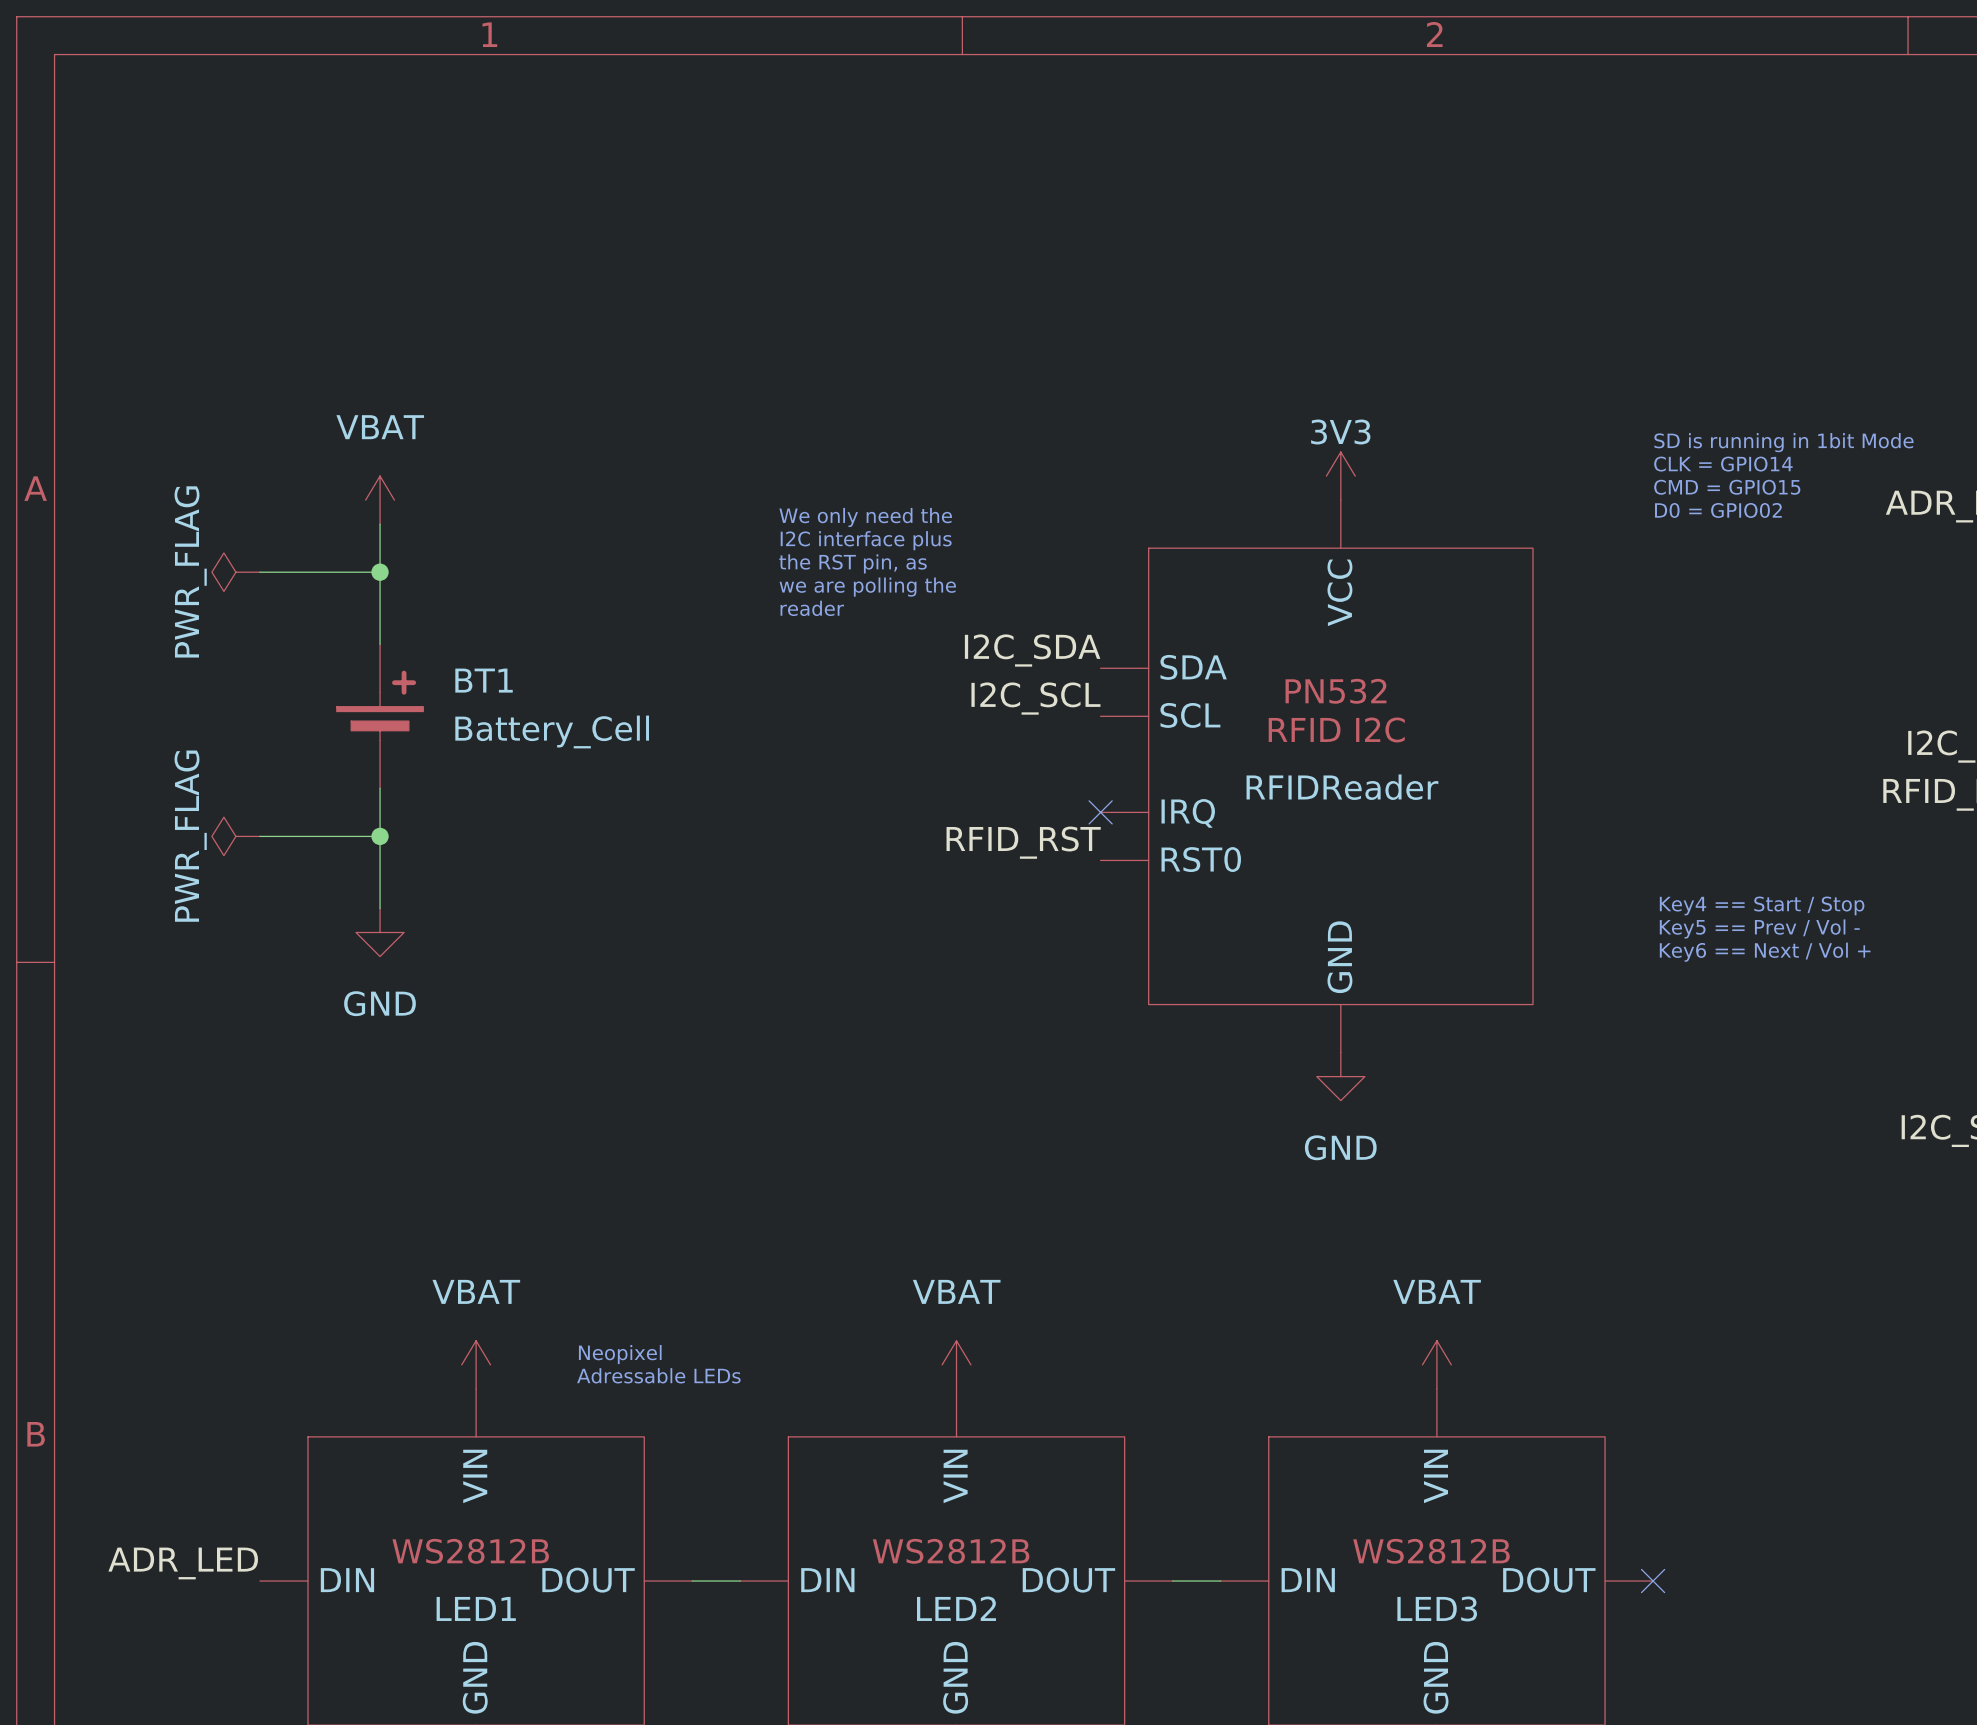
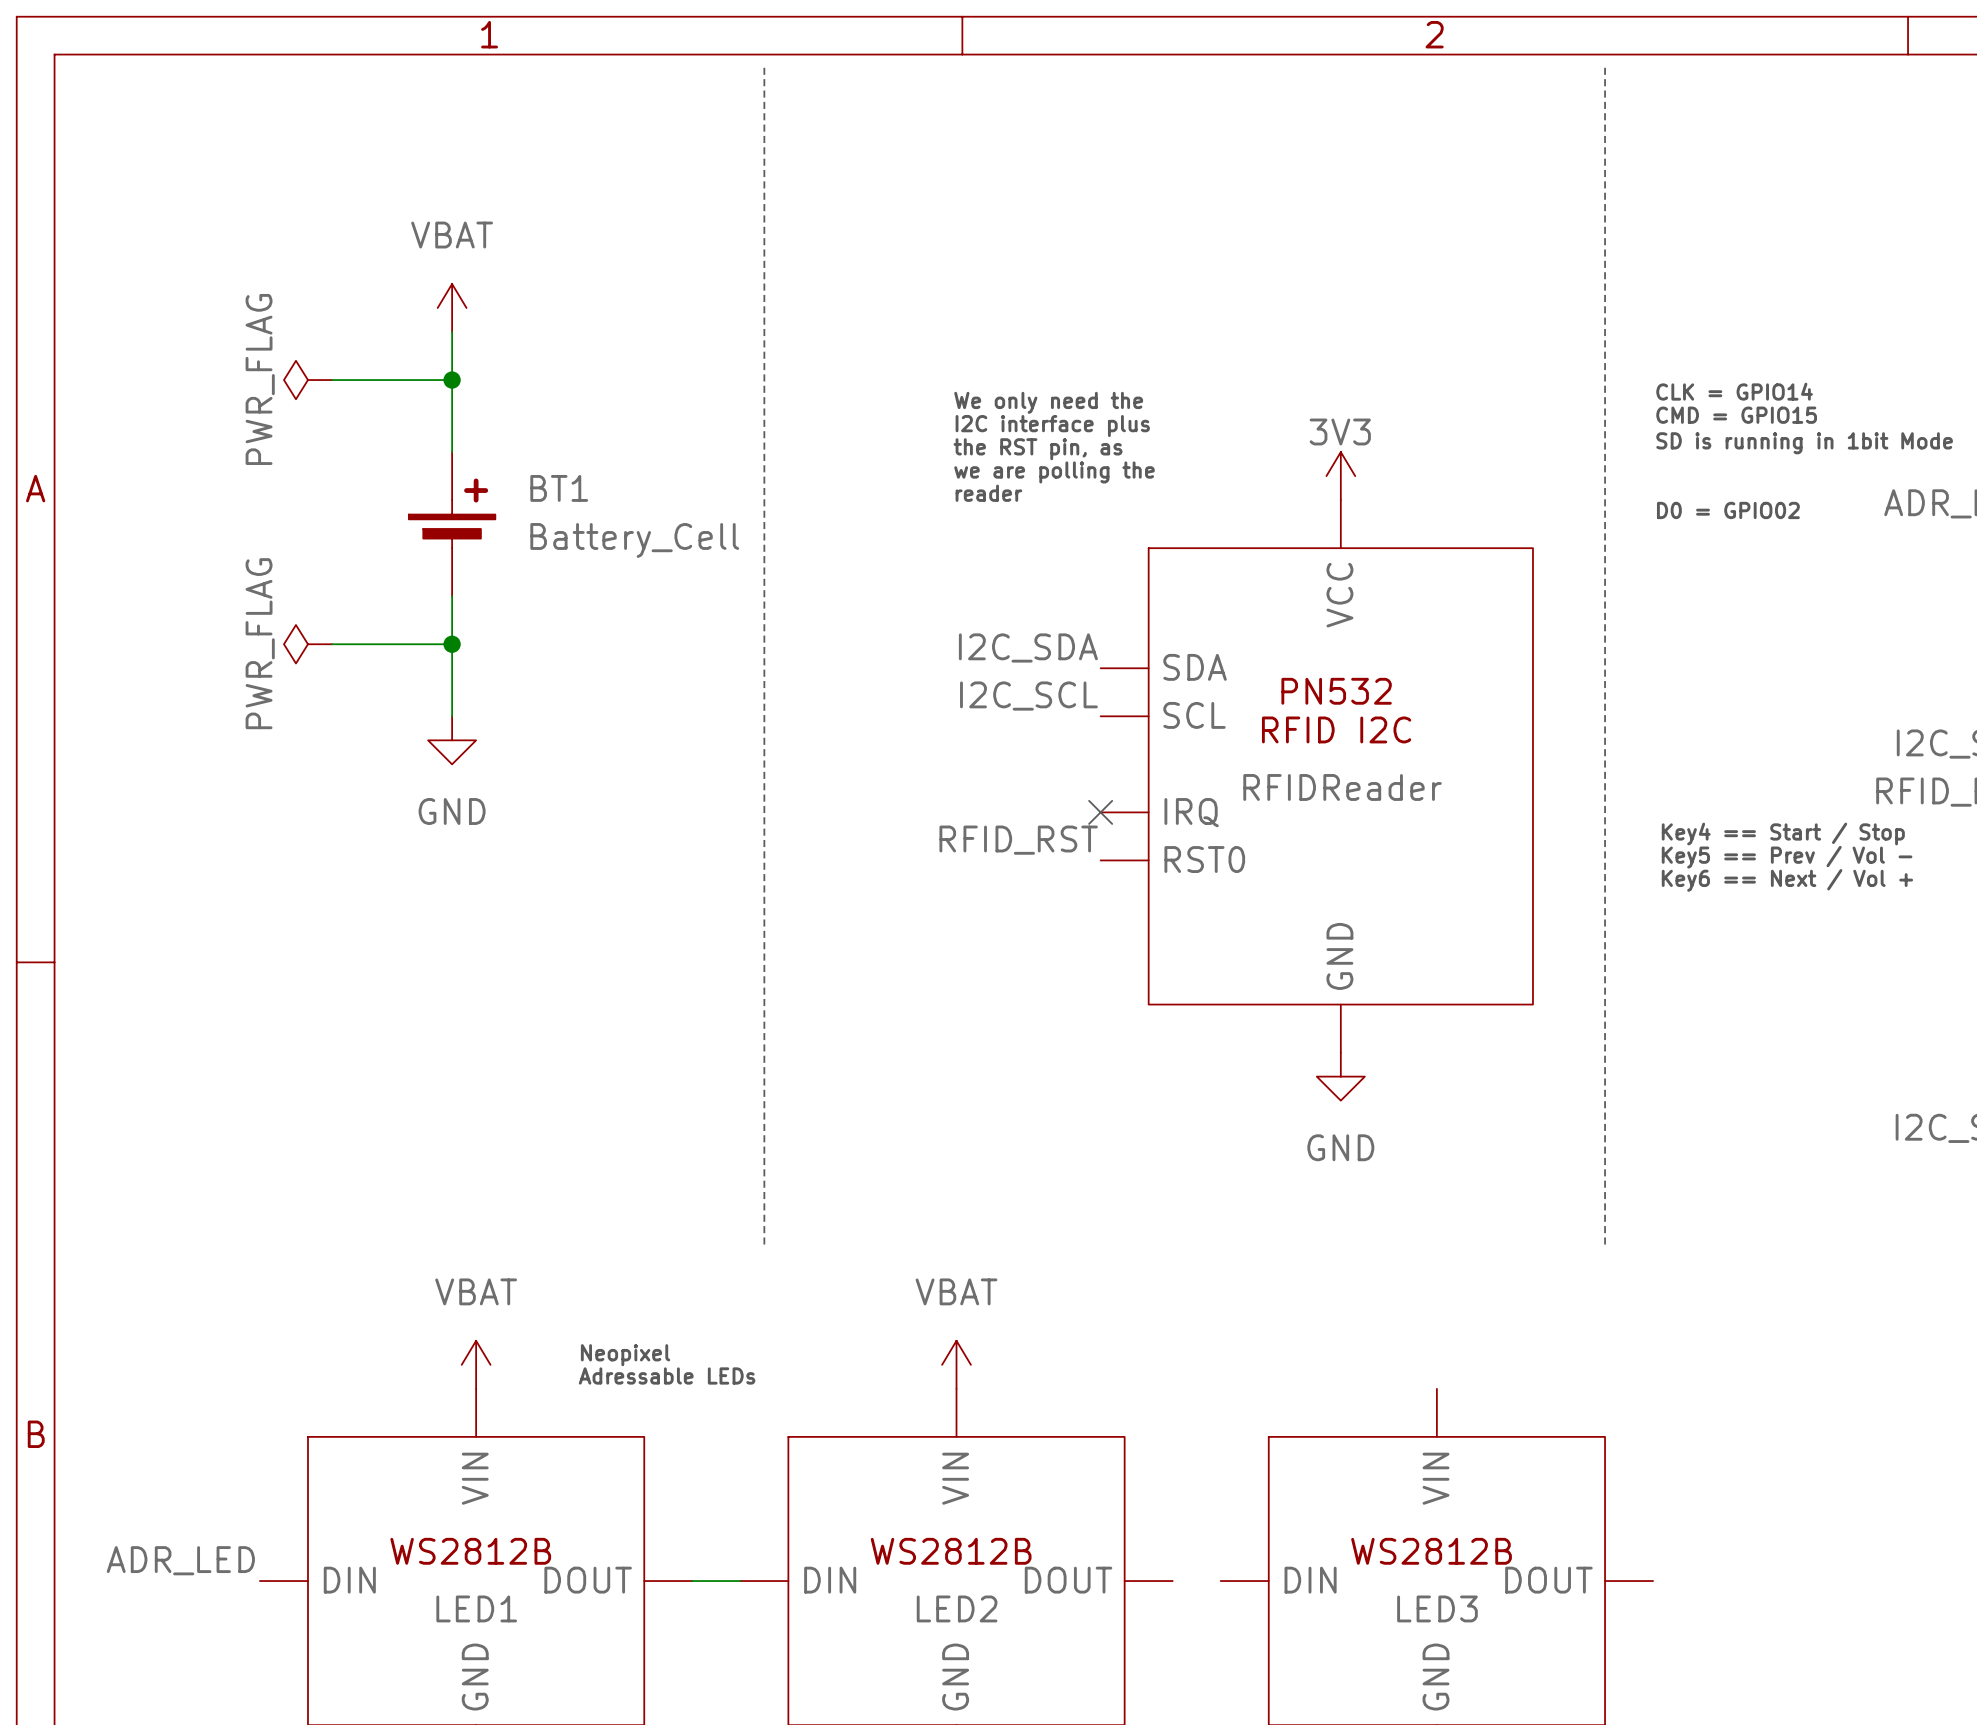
line: none -> (764, 67) (764, 1244)
line: none -> (1605, 67) (1605, 1244)
power symbol: none -> PWR_FLAG (307, 380)
junction: none -> (452, 380)
text position: CLK = GPIO14 (1723, 464) -> CLK = GPIO14 (1734, 391)
text position: CMD = GPIO15 (1727, 487) -> CMD = GPIO15 (1736, 415)
power symbol position: VBAT (380, 500) -> VBAT (452, 307)
text position: We only need the (865, 517) -> We only need the (1048, 402)
wire: (380, 524) (380, 644) -> (452, 332) (452, 452)
text position: I2C interface plus (866, 540) -> I2C interface plus (1052, 426)
text position: the RST pin, as (853, 563) -> the RST pin, as (1038, 449)
power symbol position: PWR_FLAG (235, 572) -> PWR_FLAG (307, 644)
wire: (259, 572) (380, 572) -> (332, 380) (452, 380)
junction position: (380, 572) -> (452, 644)
text position: we are polling the (867, 587) -> we are polling the (1054, 472)
text position: reader (812, 608) -> reader (988, 493)
BT1 position: (380, 716) -> (452, 524)
wire: (380, 788) (380, 908) -> (452, 596) (452, 716)
power symbol: PWR_FLAG (235, 836) -> none
wire: (259, 836) (380, 836) -> (332, 644) (452, 644)
junction: (380, 836) -> none
text position: Key4 == Start / Stop (1762, 905) -> Key4 == Start / Stop (1783, 834)
text position: Key5 == Prev / Vol - (1759, 928) -> Key5 == Prev / Vol - (1787, 857)
power symbol position: GND (380, 932) -> GND (452, 740)
text position: Key6 == Next / Vol + (1765, 952) -> Key6 == Next / Vol + (1787, 880)
power symbol: VBAT (1436, 1364) -> none
wire: (1172, 1581) (1220, 1581) -> none
no-connect mark: (1653, 1581) -> none

